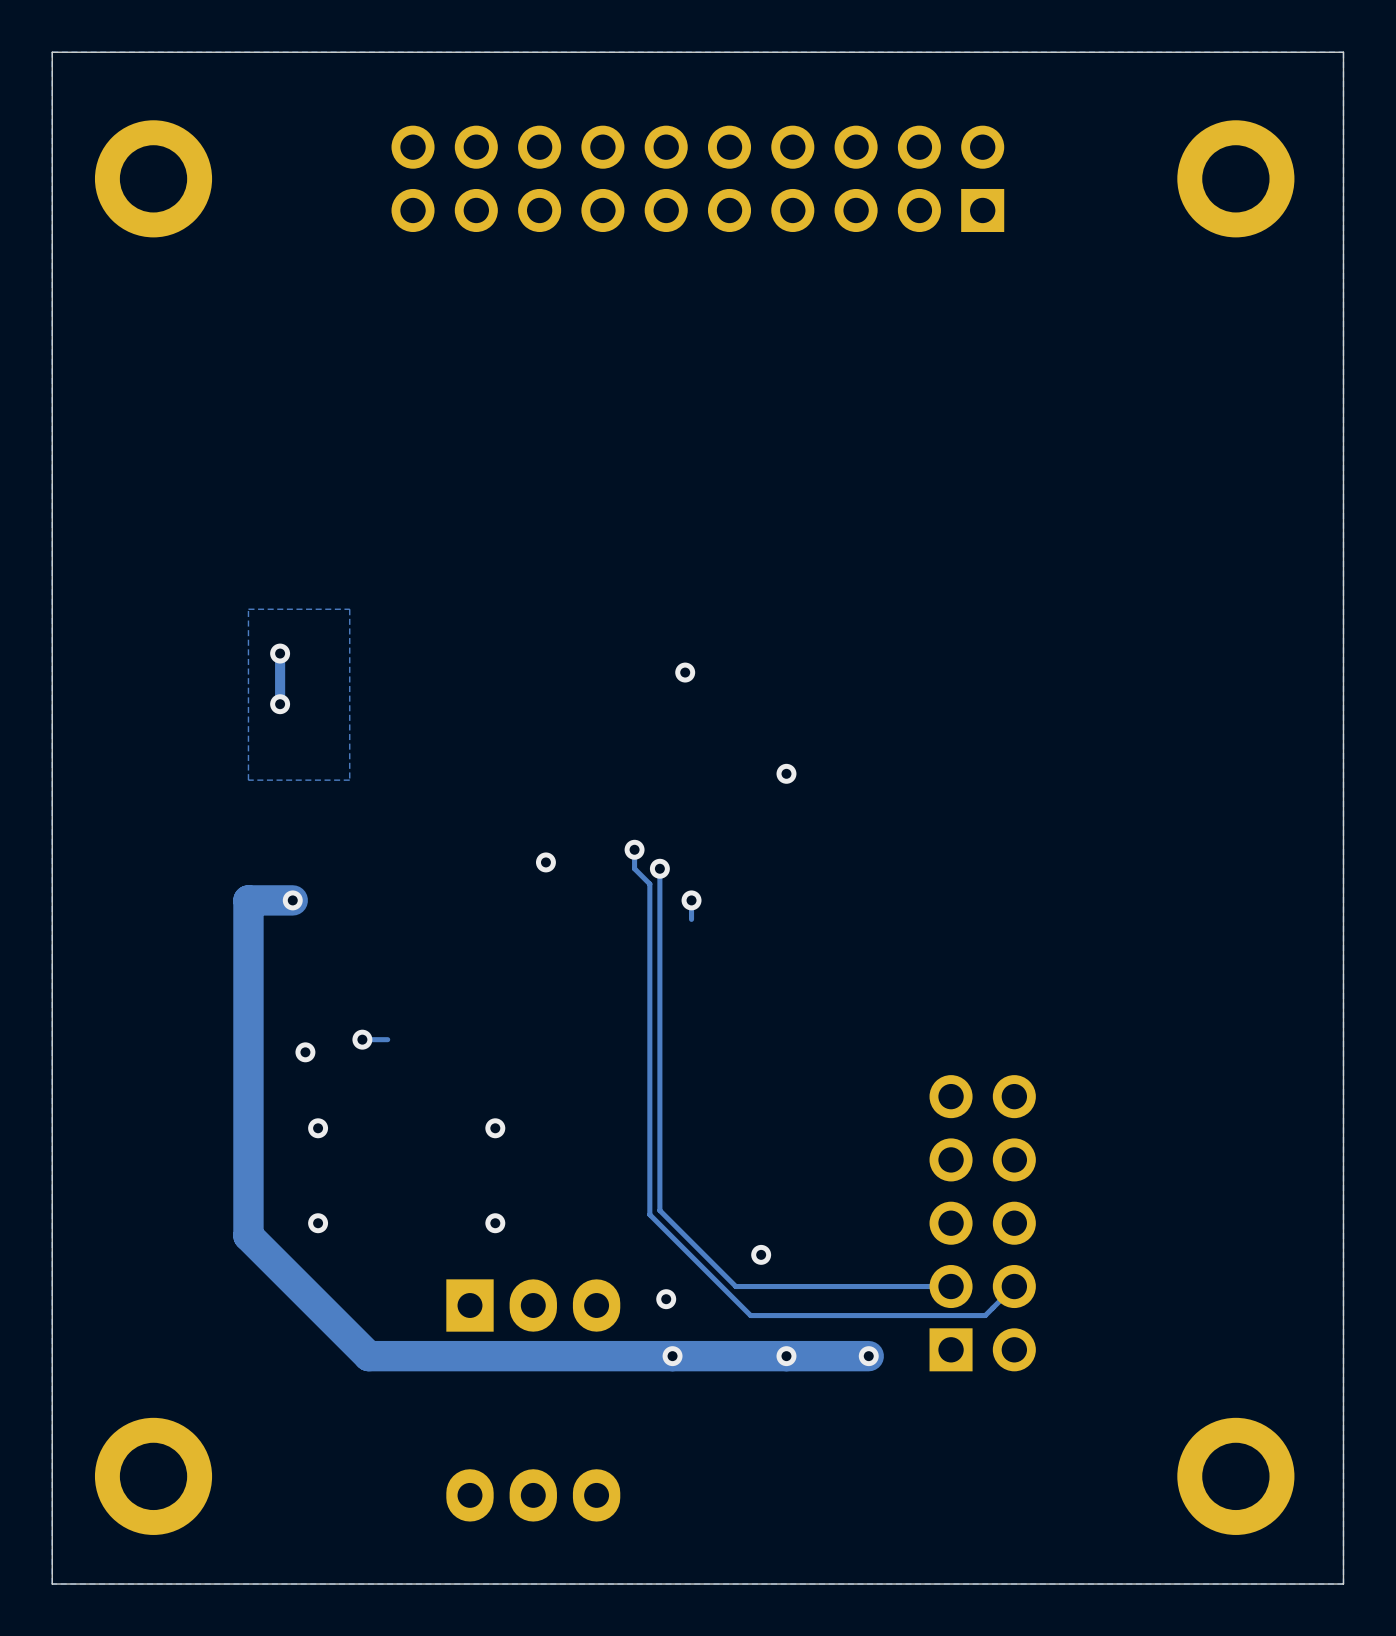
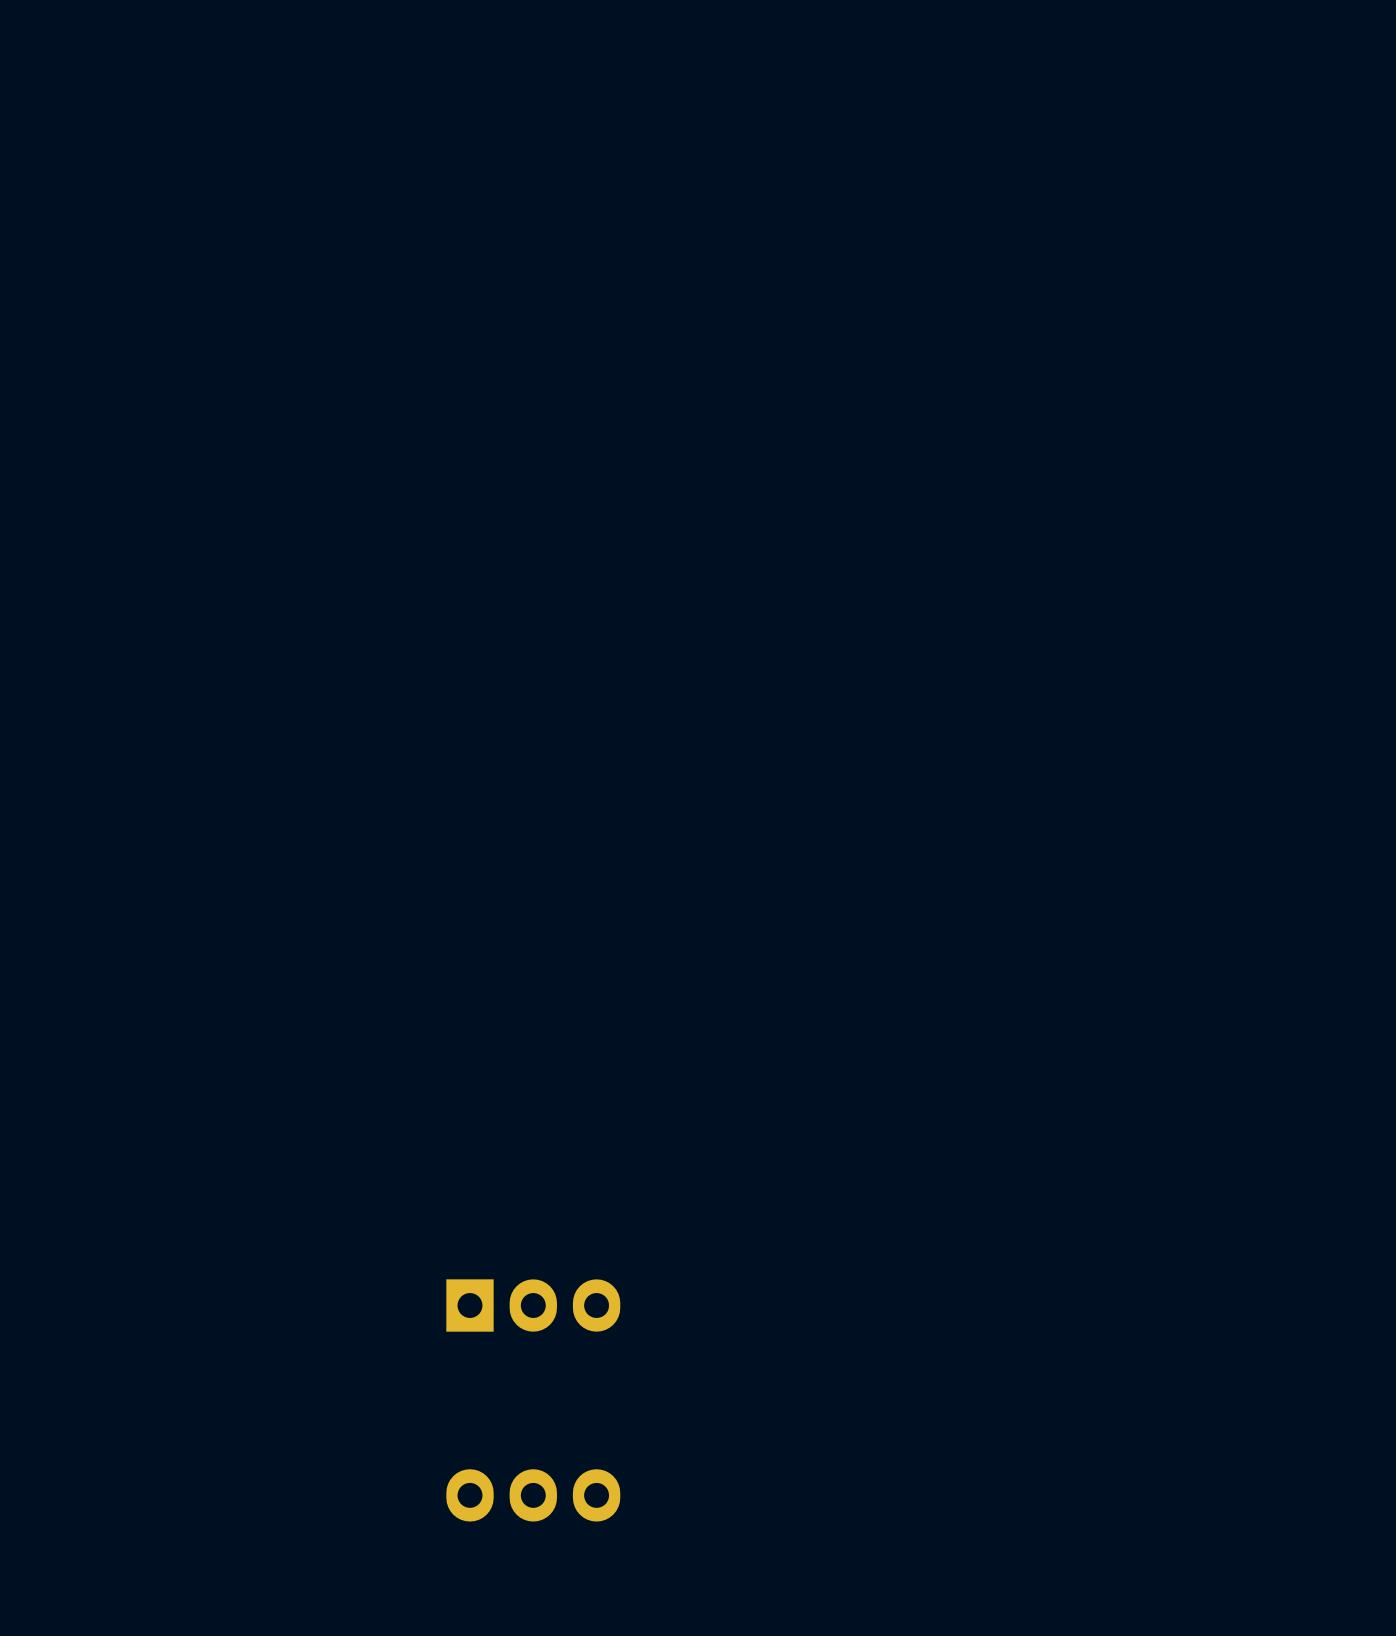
board edge: (1343, 52) (52, 52) (52, 1584) (1343, 1584) (1343, 52) -> none
part: (153, 178) -> none
part: (697, 178) -> none
part: (1235, 178) -> none
zone outline: (349, 609) (349, 780) (248, 780) (248, 609) (349, 609) -> none
track: (280, 653) (280, 704) -> none
via: (280, 653) -> none
via: (685, 672) -> none
via: (280, 704) -> none
via: (786, 773) -> none
track: (634, 849) (634, 868) (649, 884) (649, 1214) (750, 1315) (985, 1315) (1014, 1286) -> none
via: (634, 849) -> none
via: (545, 862) -> none
track: (659, 868) (659, 1210) (735, 1286) (951, 1286) -> none
via: (659, 868) -> none
track: (292, 900) (248, 900) (248, 1235) (368, 1356) (868, 1356) -> none
via: (292, 900) -> none
track: (691, 900) (691, 919) -> none
via: (691, 900) -> none
via: (362, 1039) -> none
track: (387, 1039) (362, 1039) -> none
via: (305, 1052) -> none
via: (318, 1128) -> none
via: (495, 1128) -> none
via: (318, 1223) -> none
via: (495, 1223) -> none
part: (982, 1223) -> none
via: (761, 1254) -> none
via: (666, 1299) -> none
via: (672, 1356) -> none
via: (786, 1356) -> none
via: (868, 1356) -> none
part: (153, 1476) -> none
part: (1235, 1476) -> none

